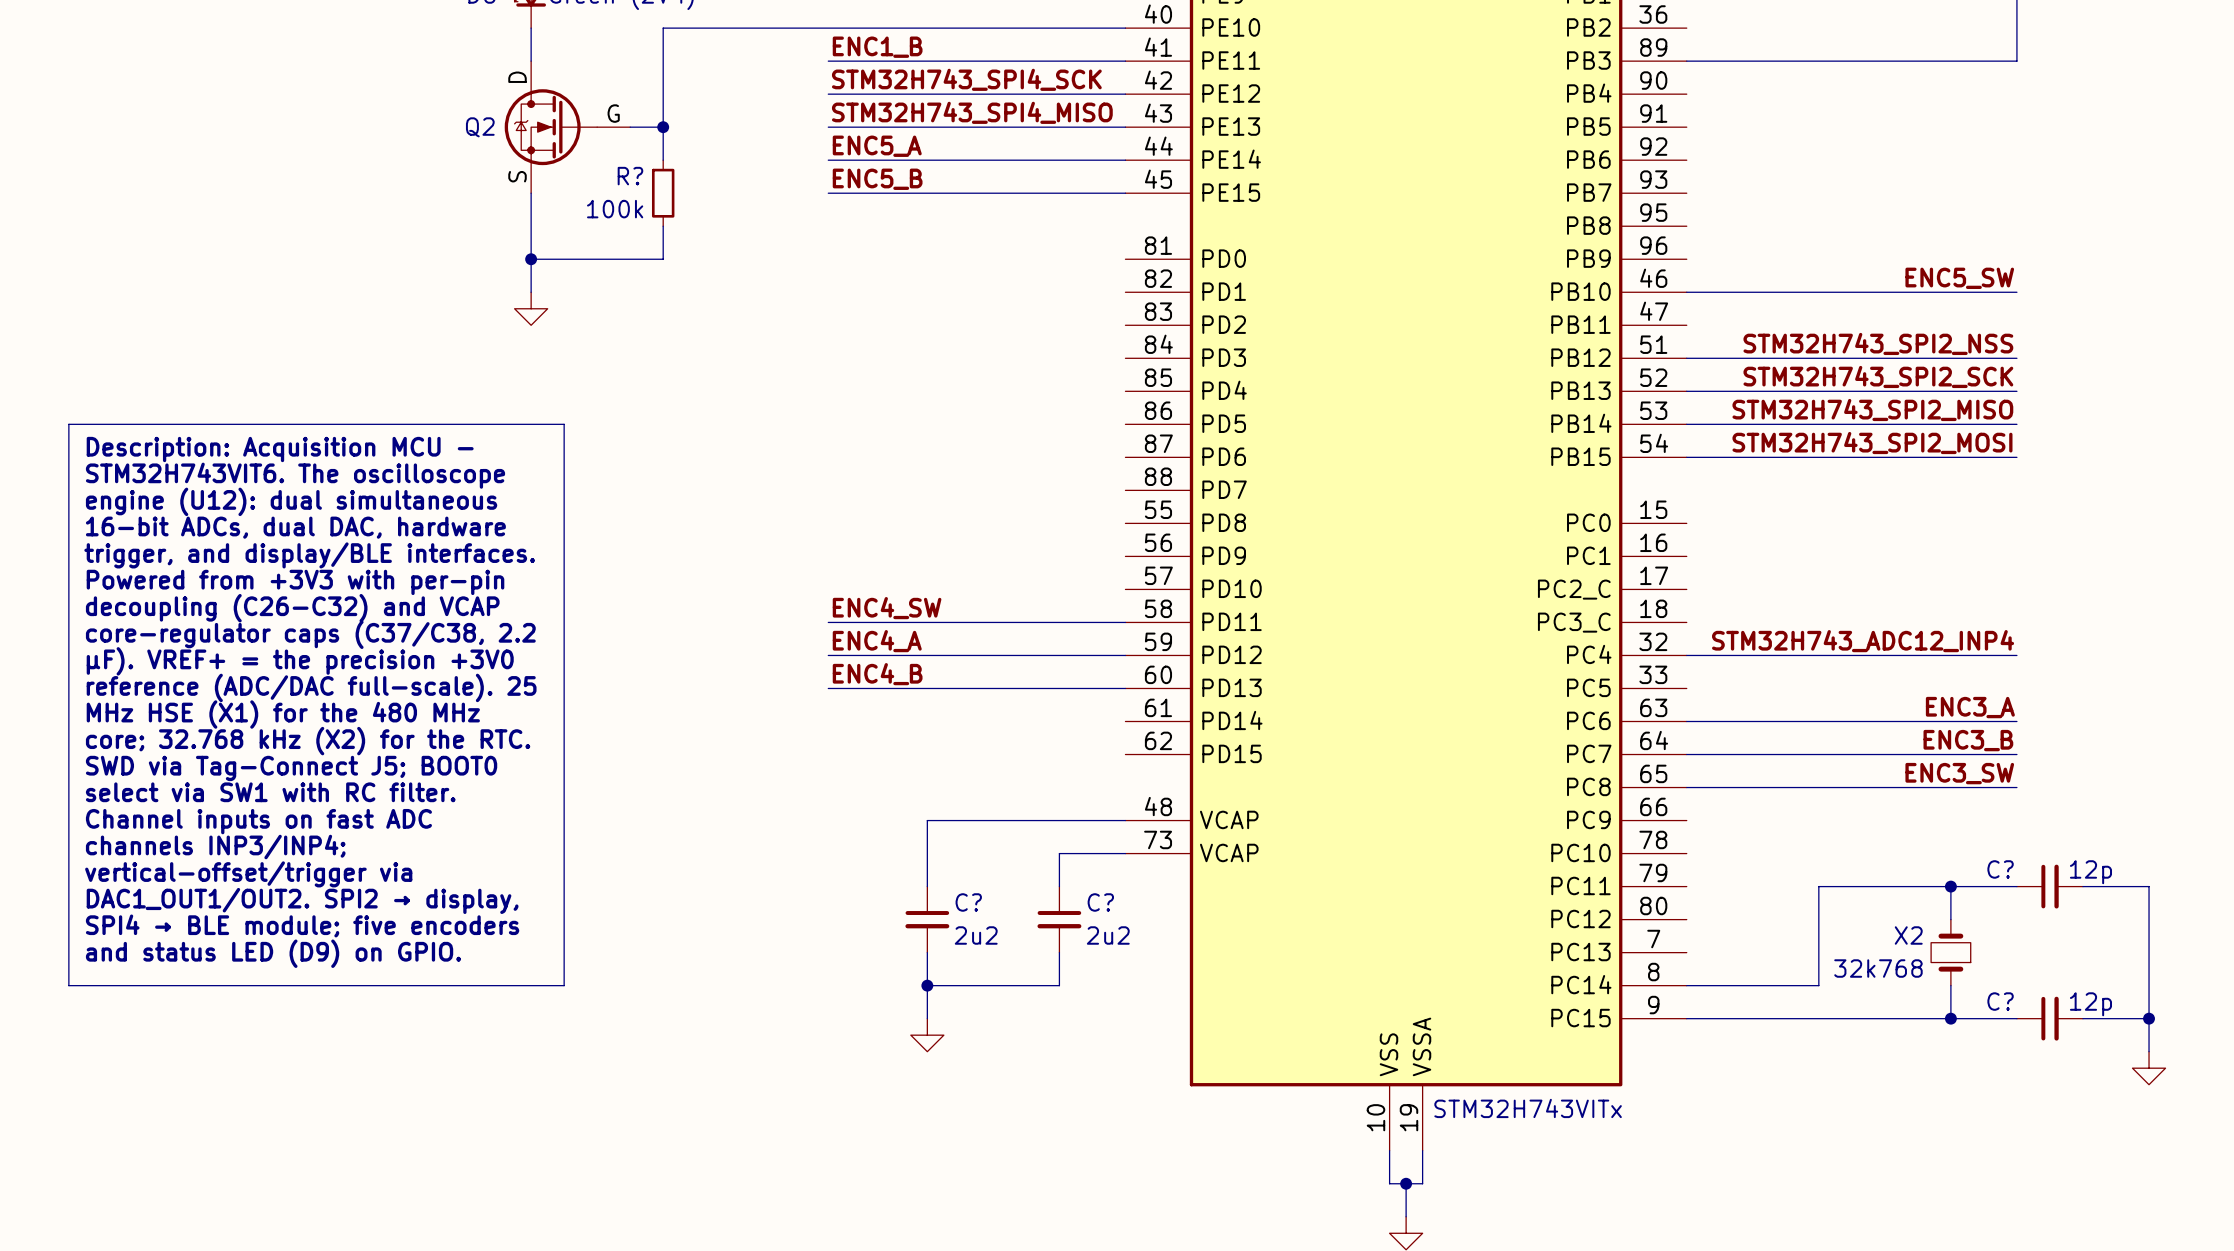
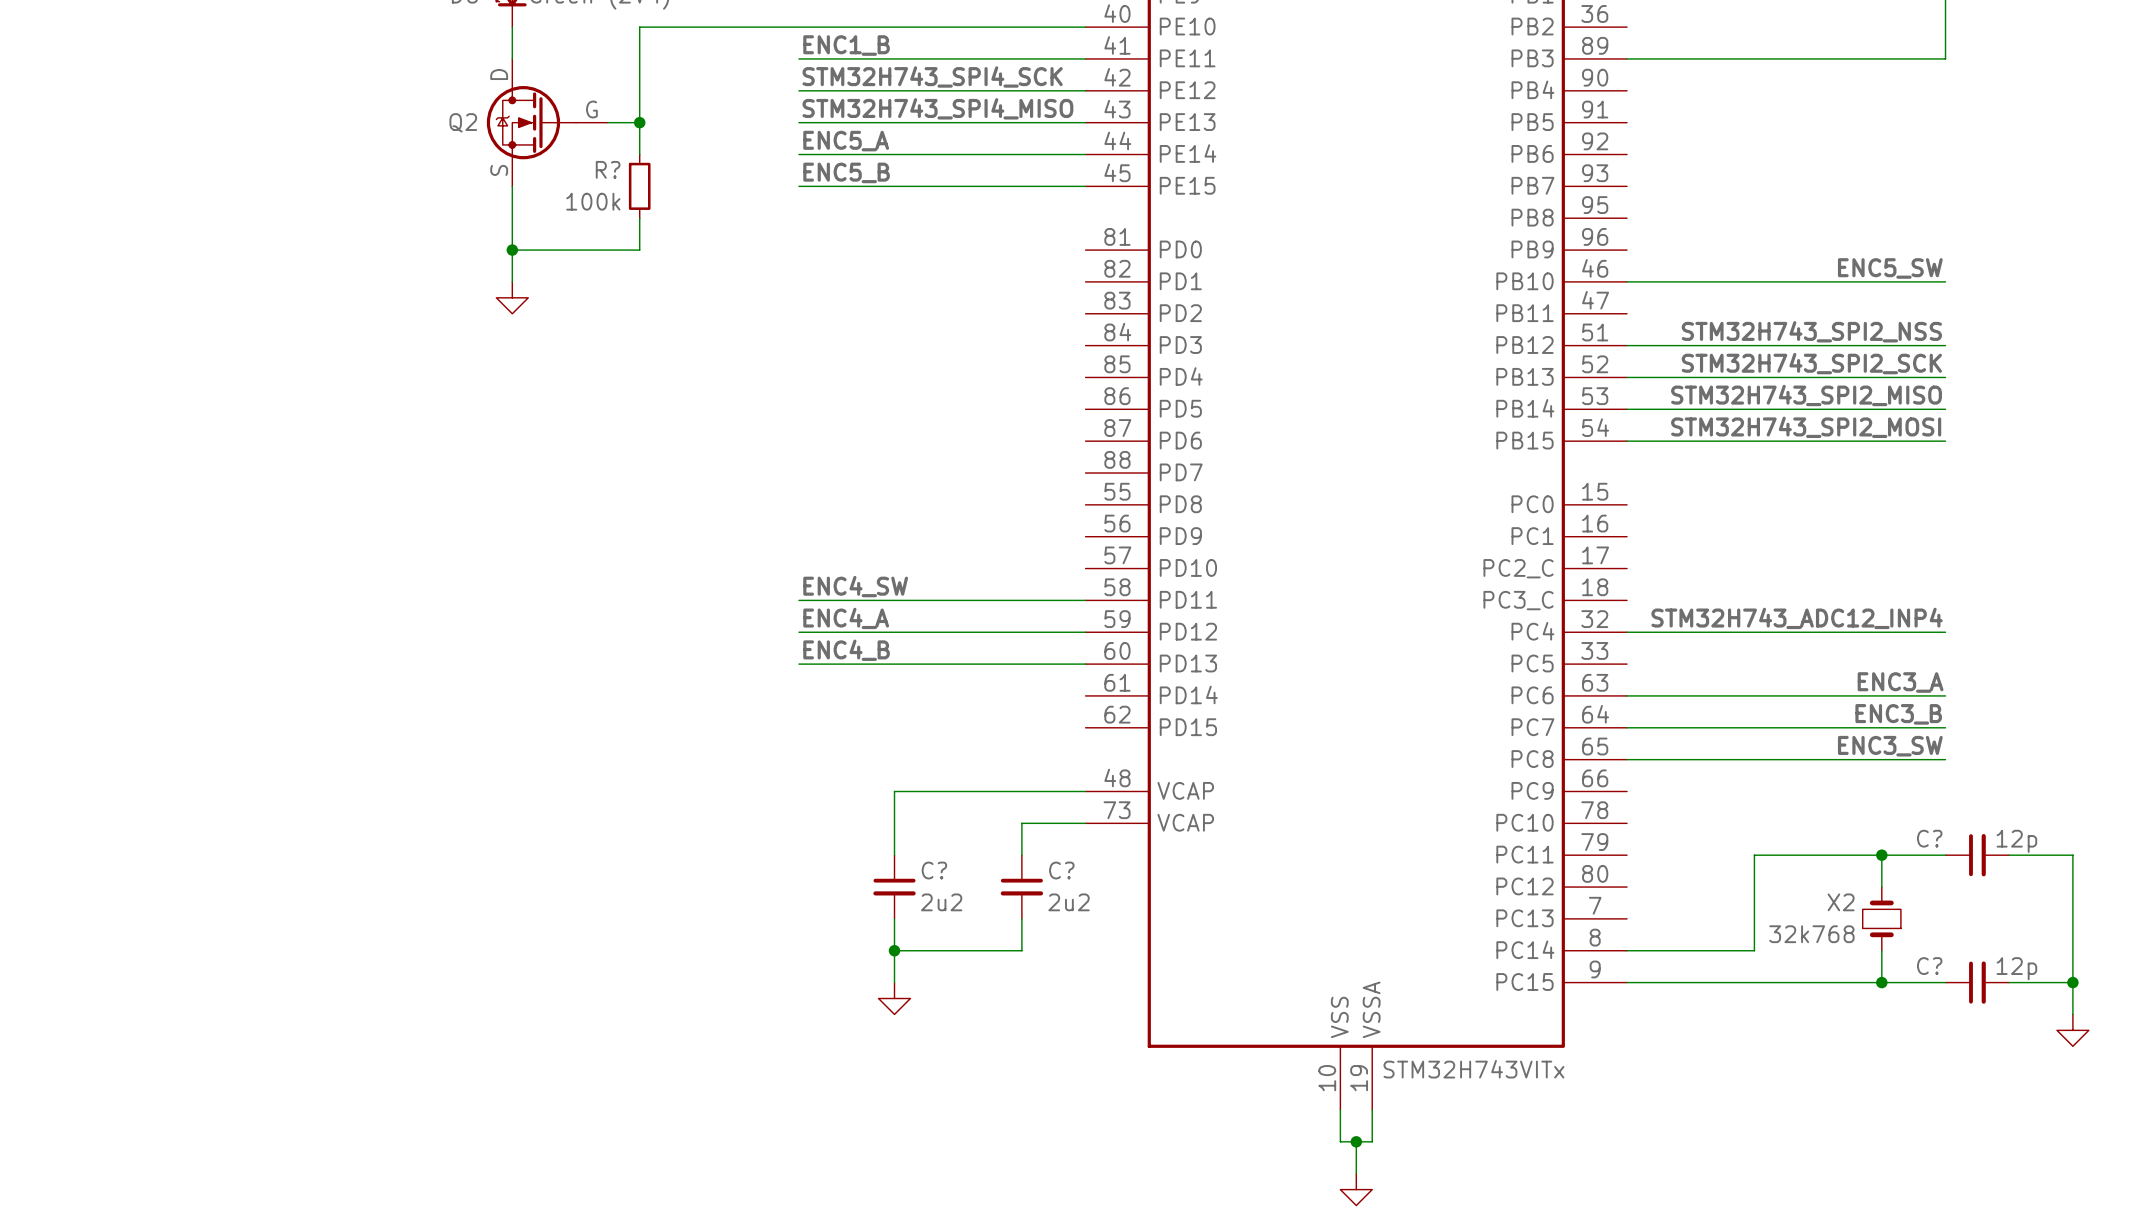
line: (68, 424) (564, 424) (564, 985) (68, 985) (68, 424) -> none
text: Description: Acquisition MCU - (280, 449) -> none
text: STM32H743VIT6. The oscilloscope (295, 475) -> none
text: engine (U12): dual simultaneous (291, 501) -> none
text: 16-bit ADCs, dual DAC, hardware (295, 527) -> none
text: trigger, and display/BLE interfaces. (309, 555) -> none
text: Powered from +3V3 with per-pin (295, 582) -> none
text: decoupling (C26-C32) and VCAP (292, 608) -> none
text: core-regulator caps (C37/C38, 2.2 (310, 634) -> none
text: µF). VREF+ = the precision +3V0 (300, 661) -> none
text: reference (ADC/DAC full-scale). 25 (311, 687) -> none
text: MHz HSE (X1) for the 480 MHz (283, 714) -> none
text: core; 32.768 kHz (X2) for the RTC. (308, 741) -> none
text: SWD via Tag-Connect J5; BOOT0 (291, 768) -> none
text: select via SW1 with RC filter. (270, 792) -> none
text: Channel inputs on fast ADC (258, 821) -> none
text: channels INP3/INP4; (215, 847) -> none
text: vertical-offset/trigger via (248, 874) -> none
text: DAC1_OUT1/OUT2. SPI2 → display, (302, 900) -> none
text: SPI4 → BLE module; five encoders (302, 925) -> none
text: and status LED (D9) on GPIO. (273, 953) -> none

